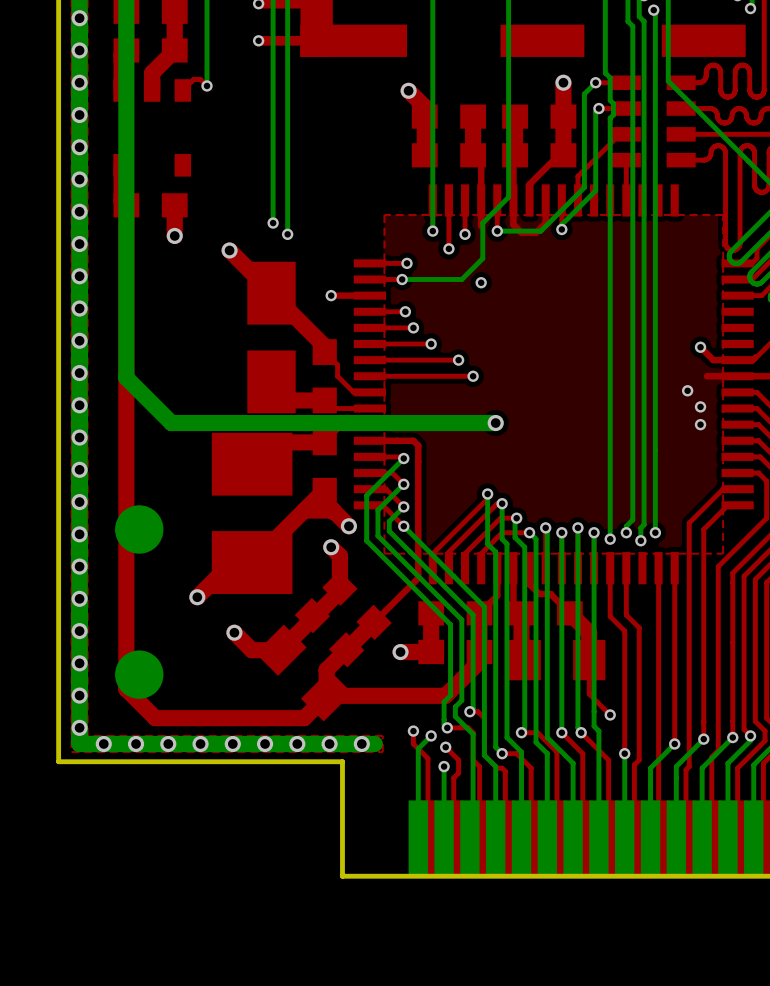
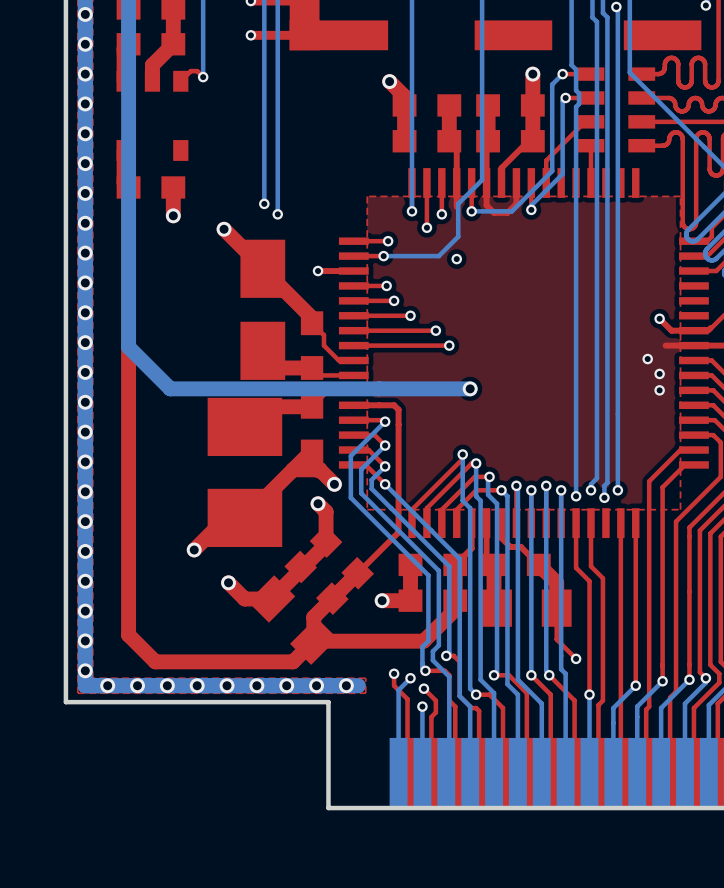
part: (139, 529) -> none
part: (139, 674) -> none

